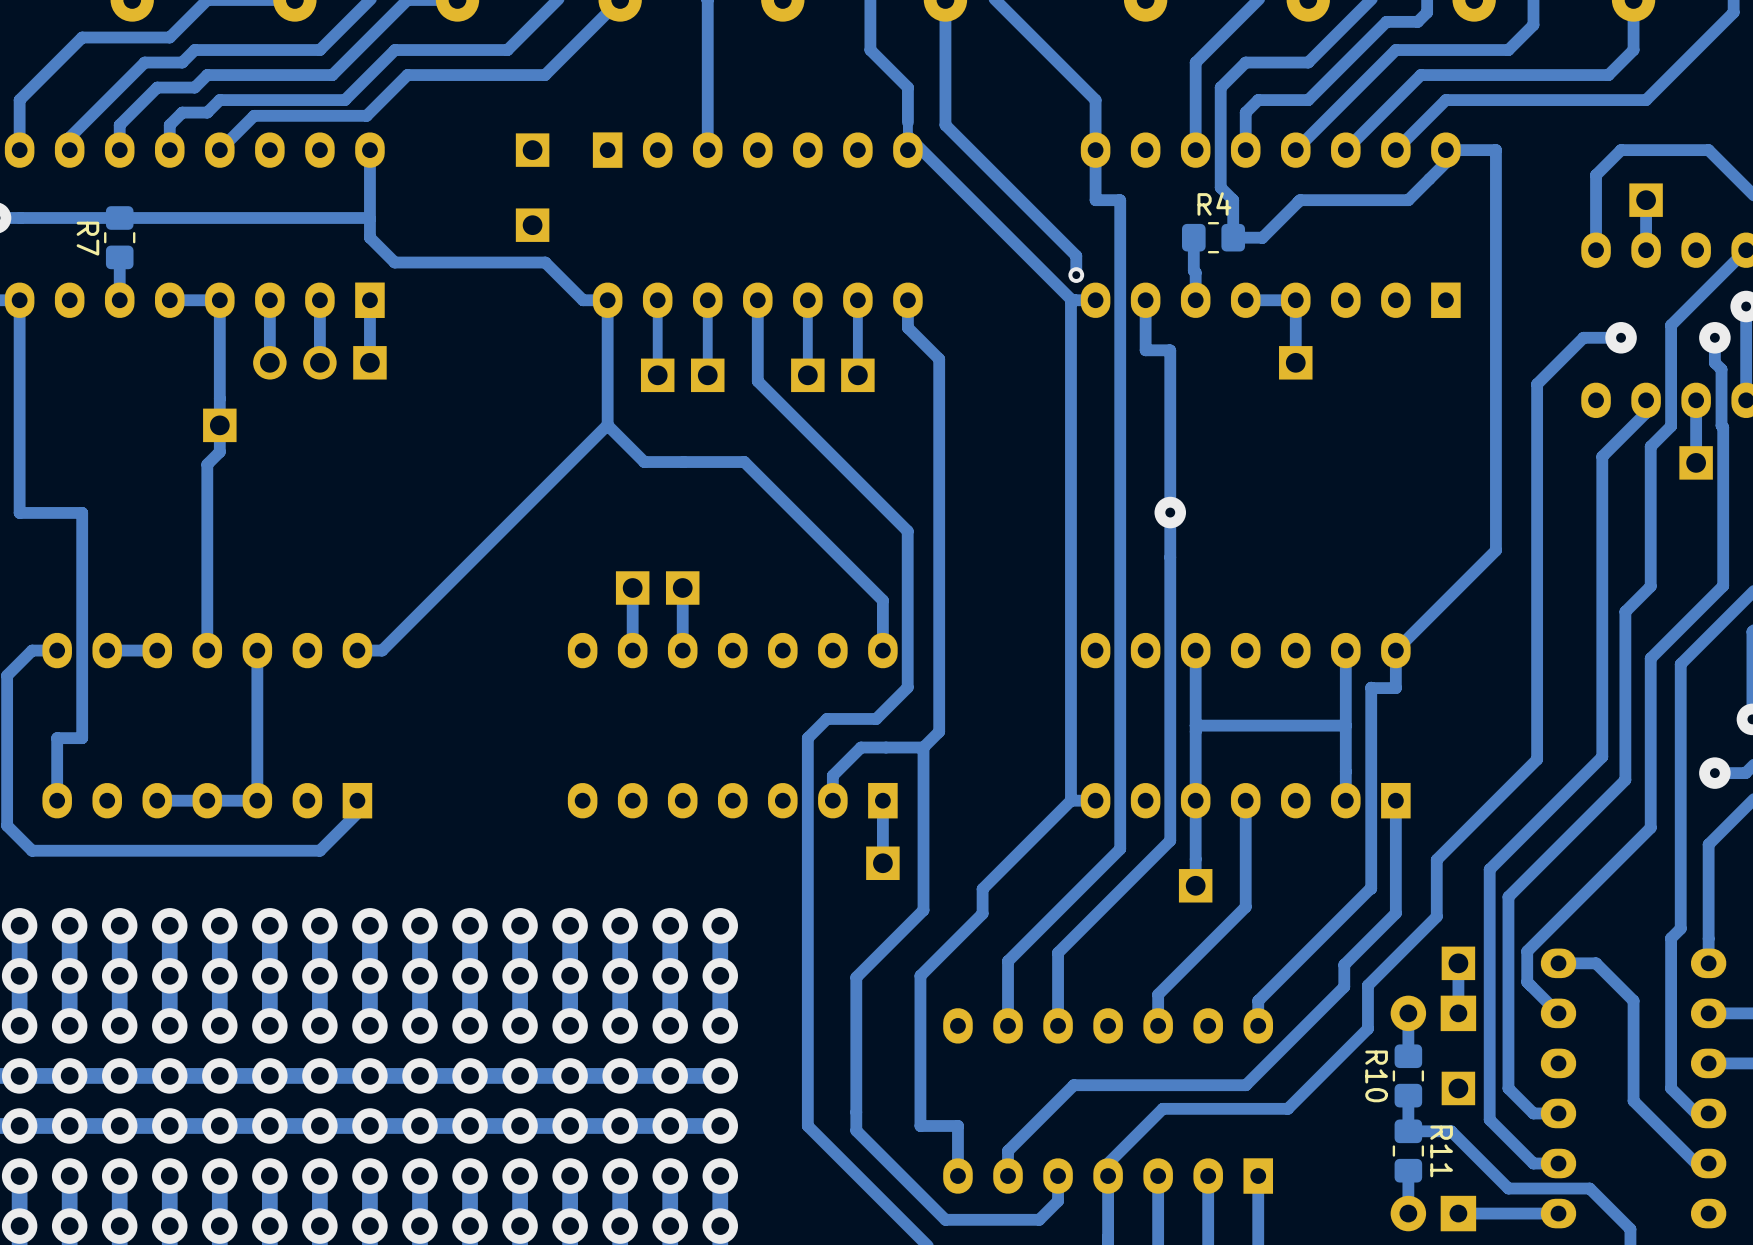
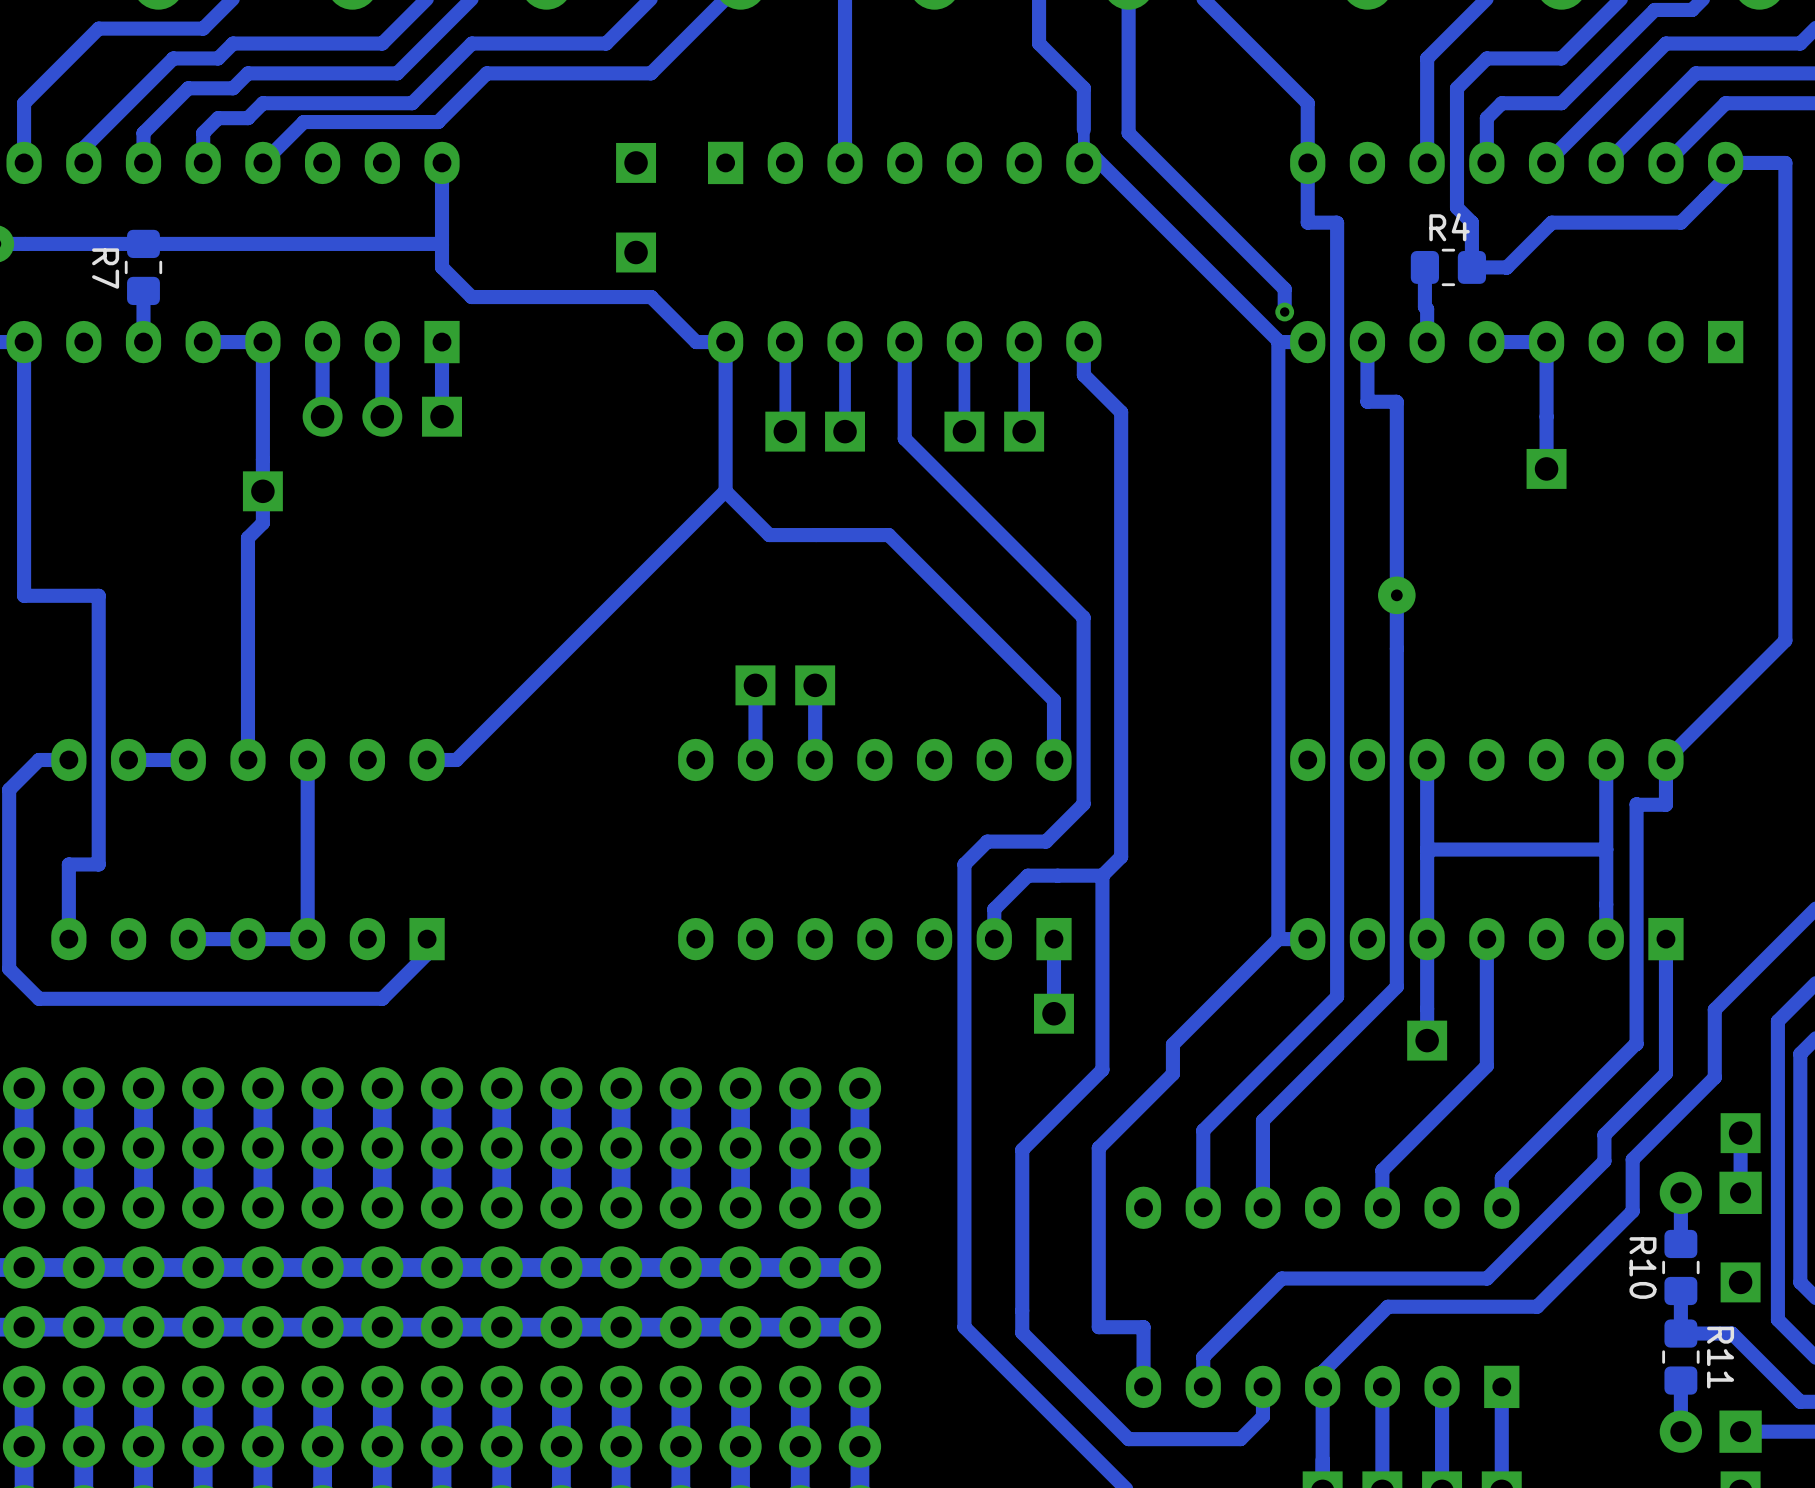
track: none -> (1546, 416) (1546, 468)
part position: (1295, 362) -> (1546, 468)

